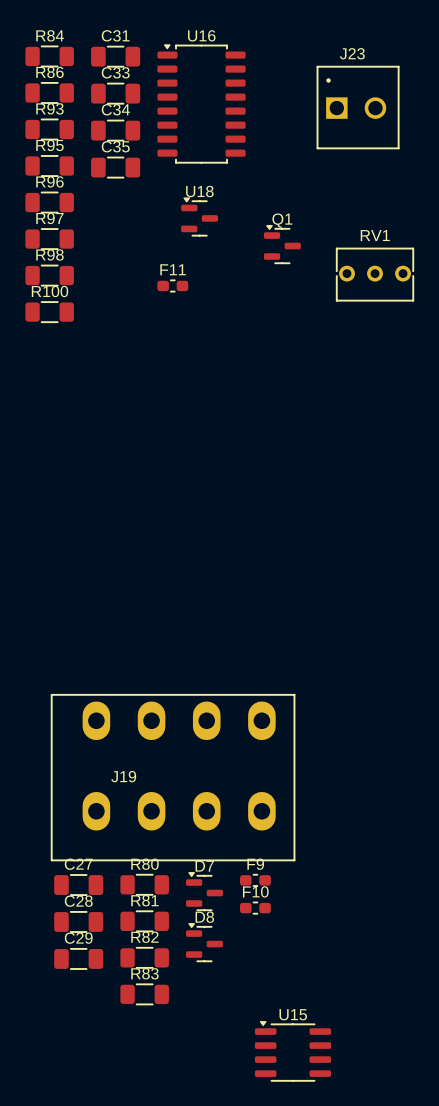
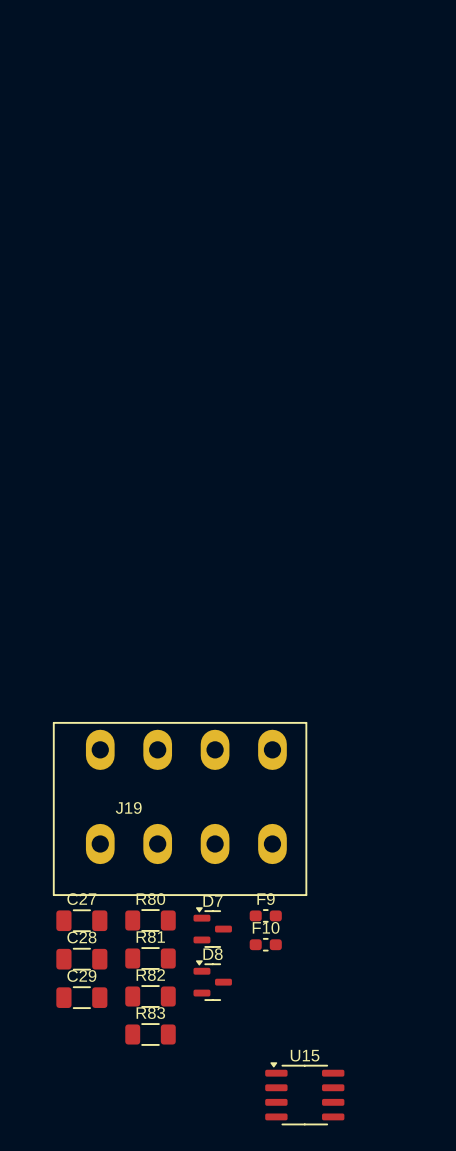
R84: (49, 56) -> none
C31: (115, 56) -> none
R86: (49, 92) -> none
C33: (115, 93) -> none
U16: (201, 103) -> none
J23: (358, 107) -> none
R93: (49, 129) -> none
C34: (115, 130) -> none
R95: (49, 166) -> none
C35: (115, 167) -> none
R96: (49, 202) -> none
U18: (199, 216) -> none
R97: (49, 239) -> none
Q1: (282, 244) -> none
RV1: (375, 274) -> none
R98: (49, 275) -> none
F11: (172, 285) -> none
R100: (49, 312) -> none

